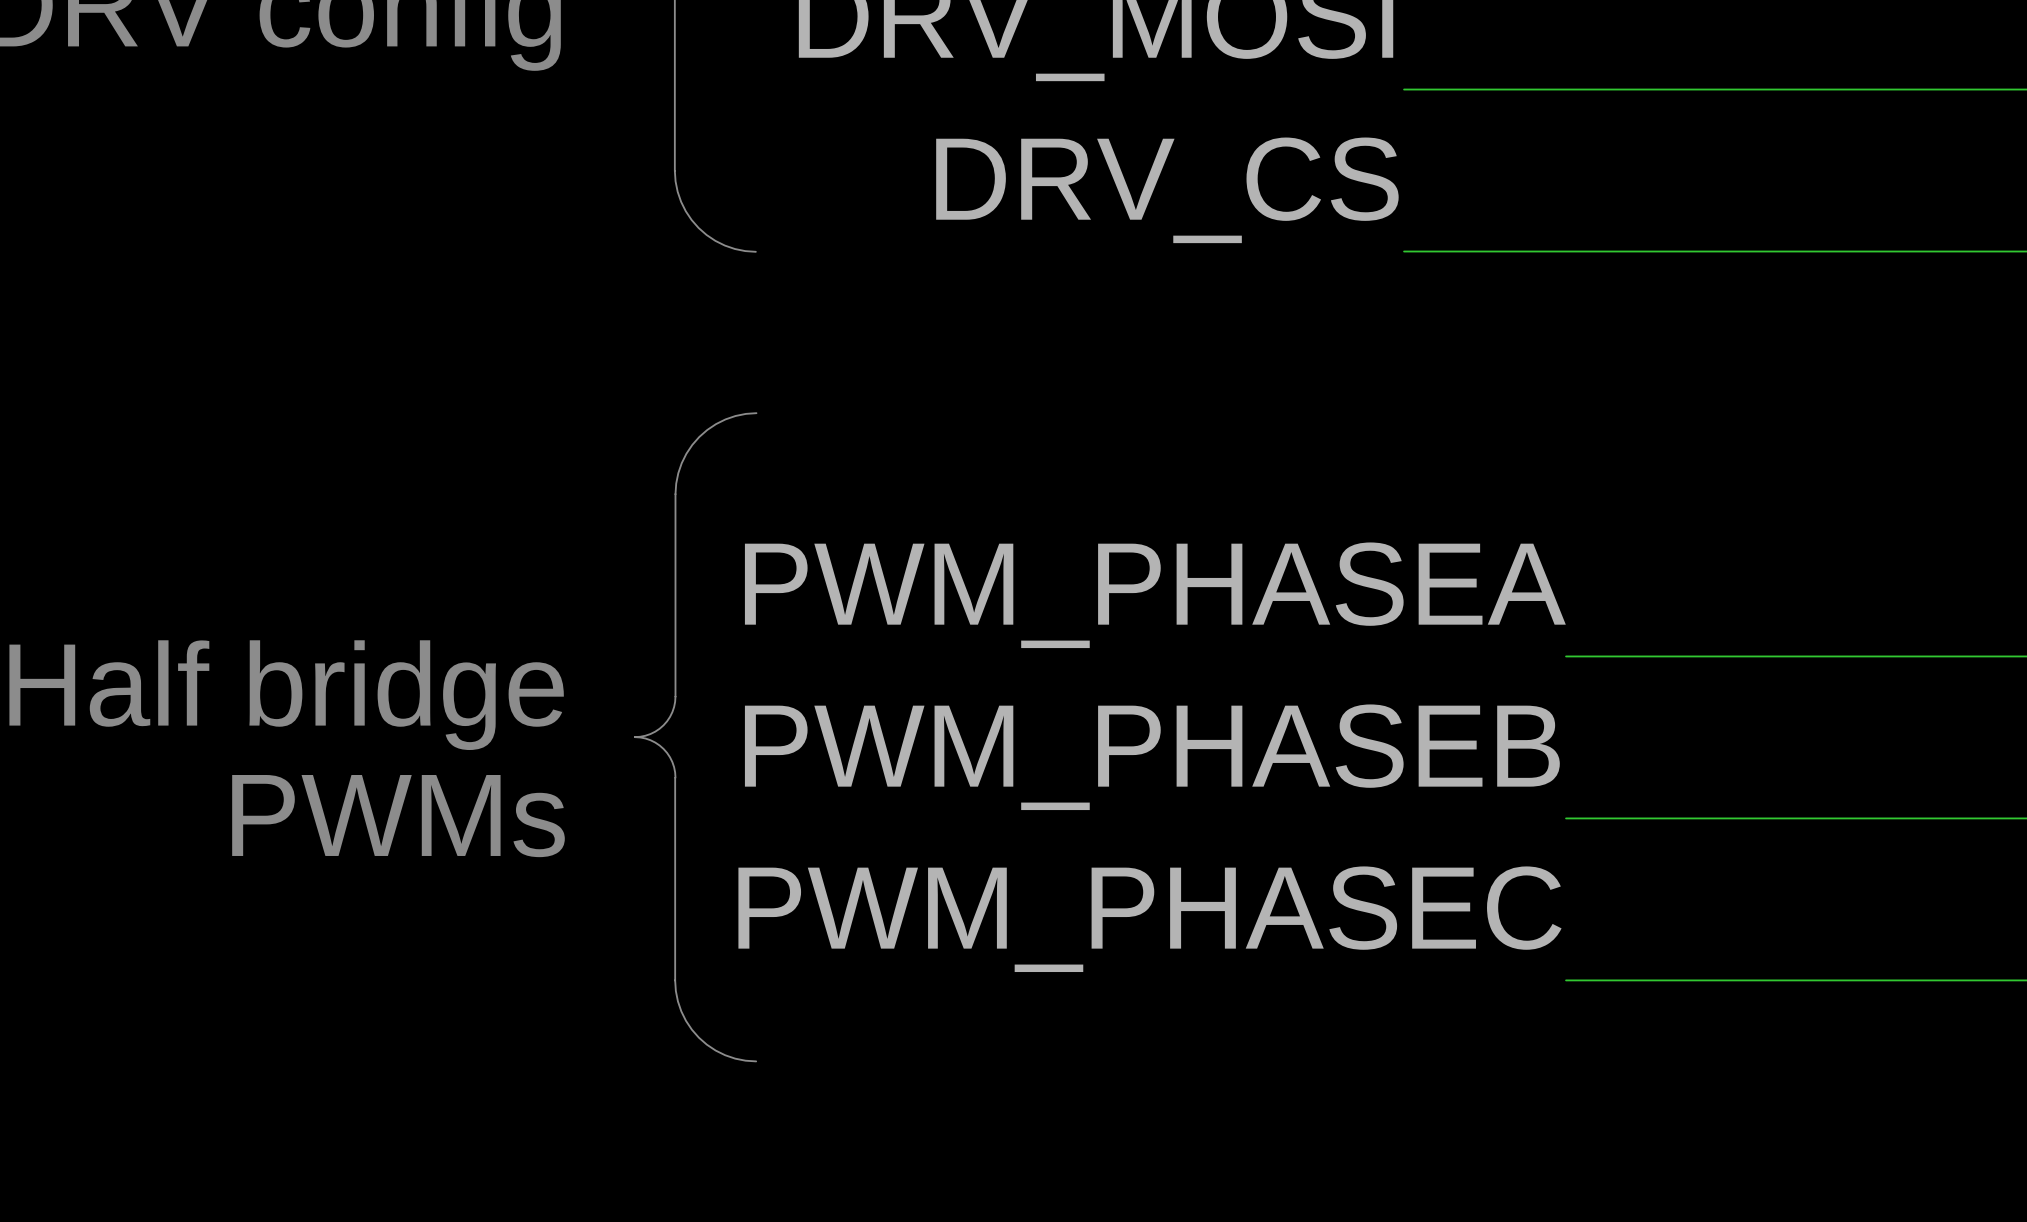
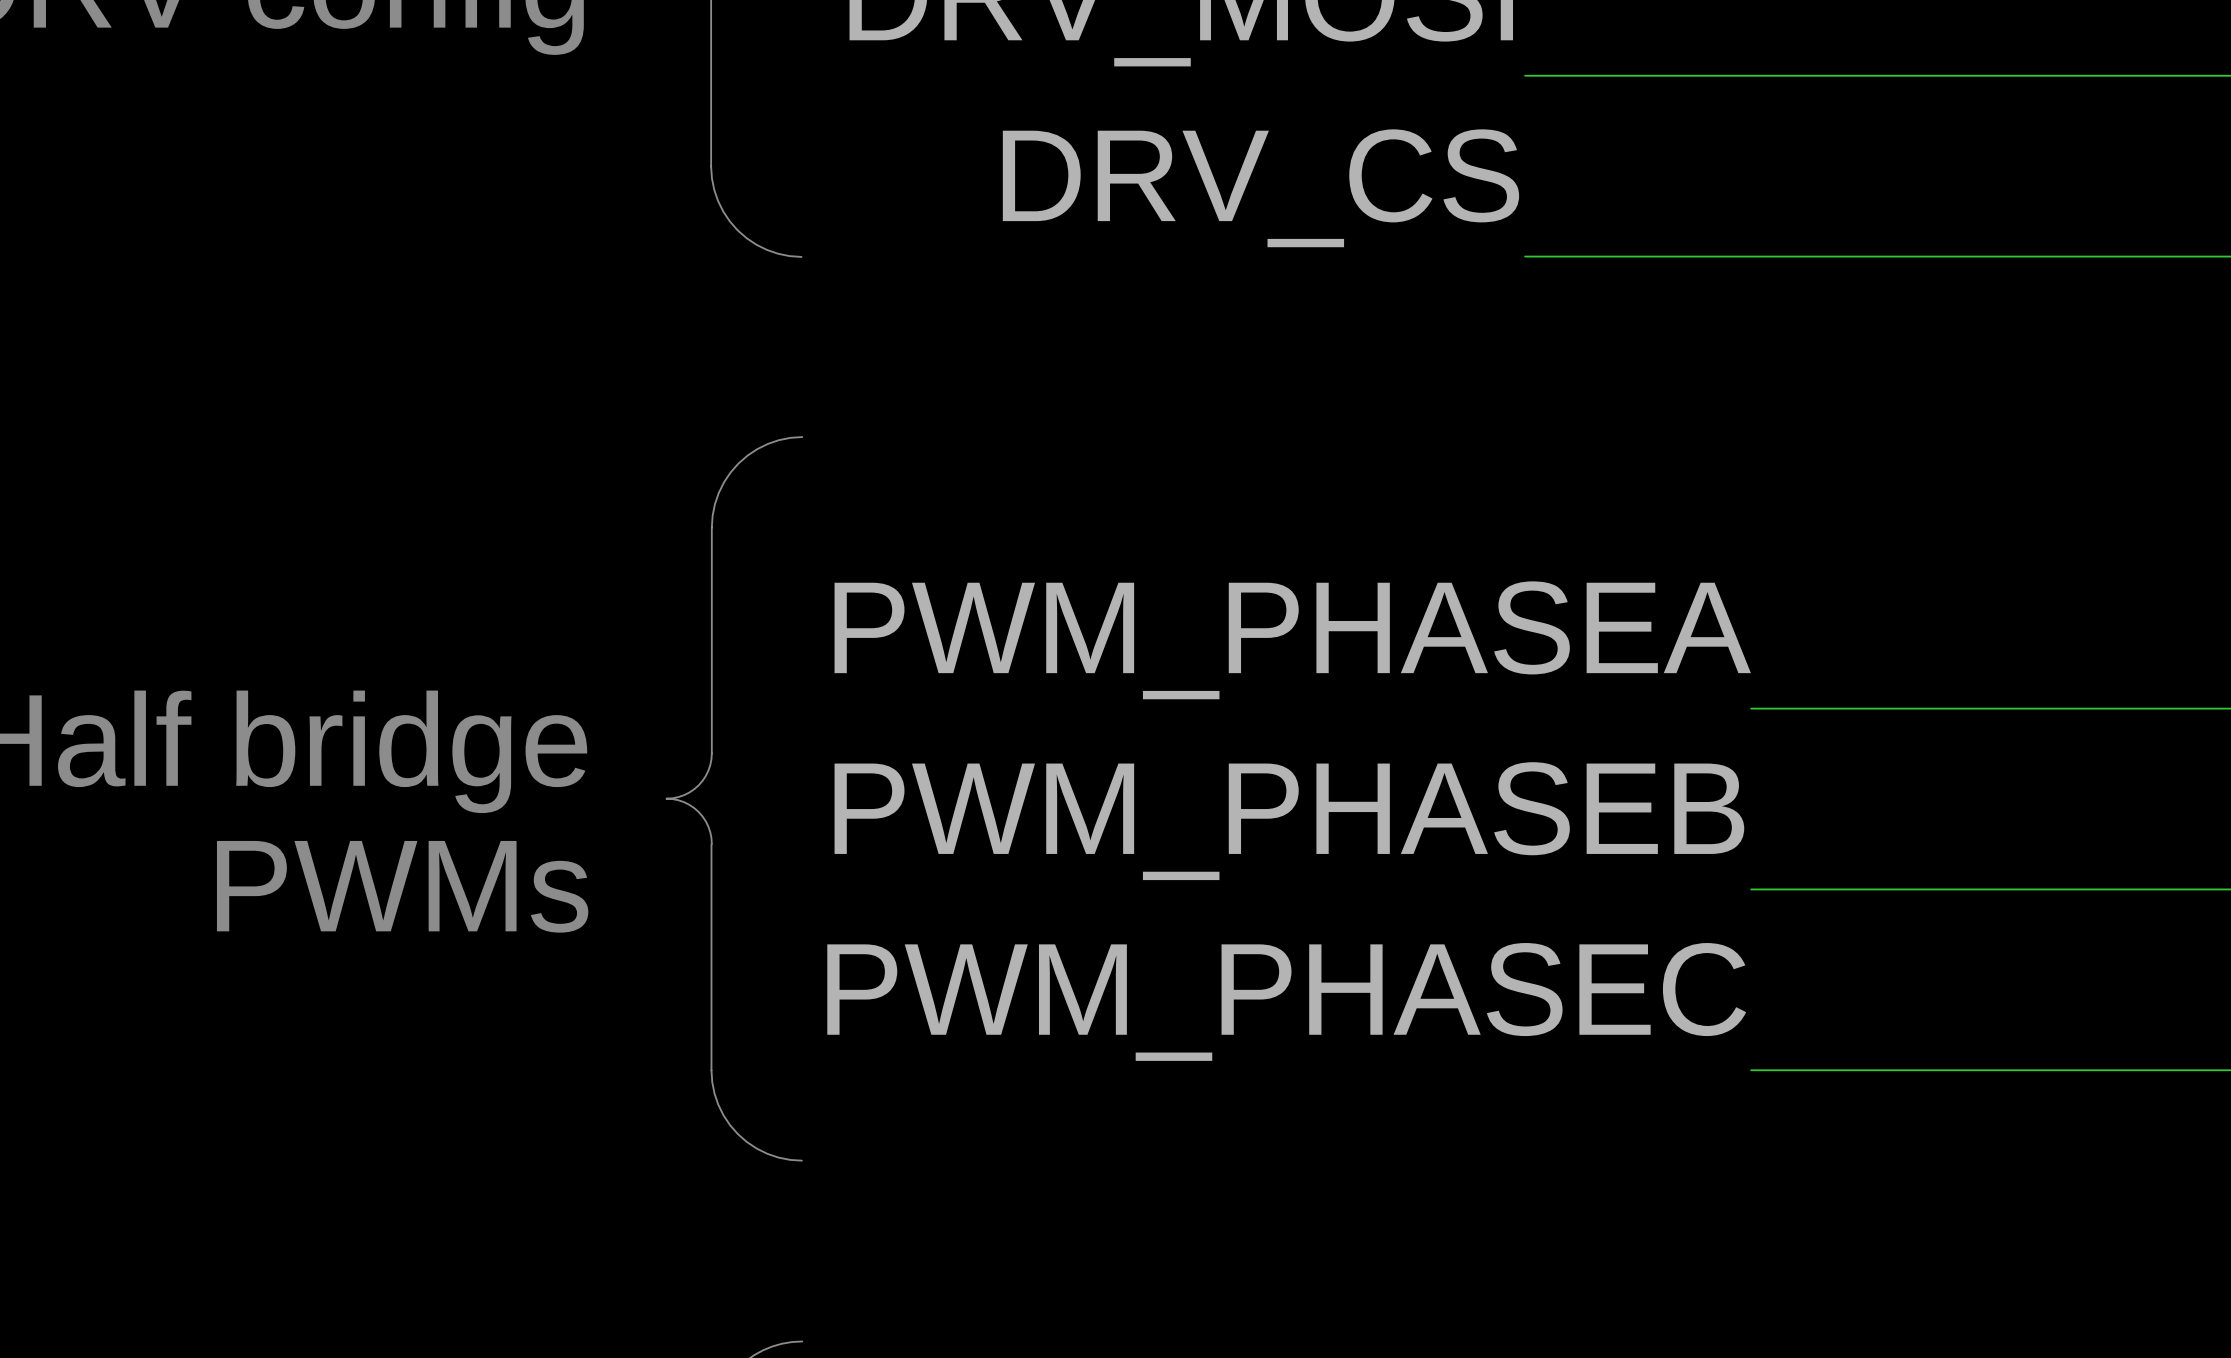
label position: PWM_PHASEA (1155, 595) -> PWM_PHASEA (1292, 640)
wire: (1566, 656) (1606, 656) -> none
label position: PWM_PHASEB (1152, 757) -> PWM_PHASEB (1289, 821)
wire: (1566, 818) (1606, 818) -> none
label position: PWM_PHASEC (1149, 919) -> PWM_PHASEC (1286, 1001)
wire: (1566, 980) (1606, 980) -> none

